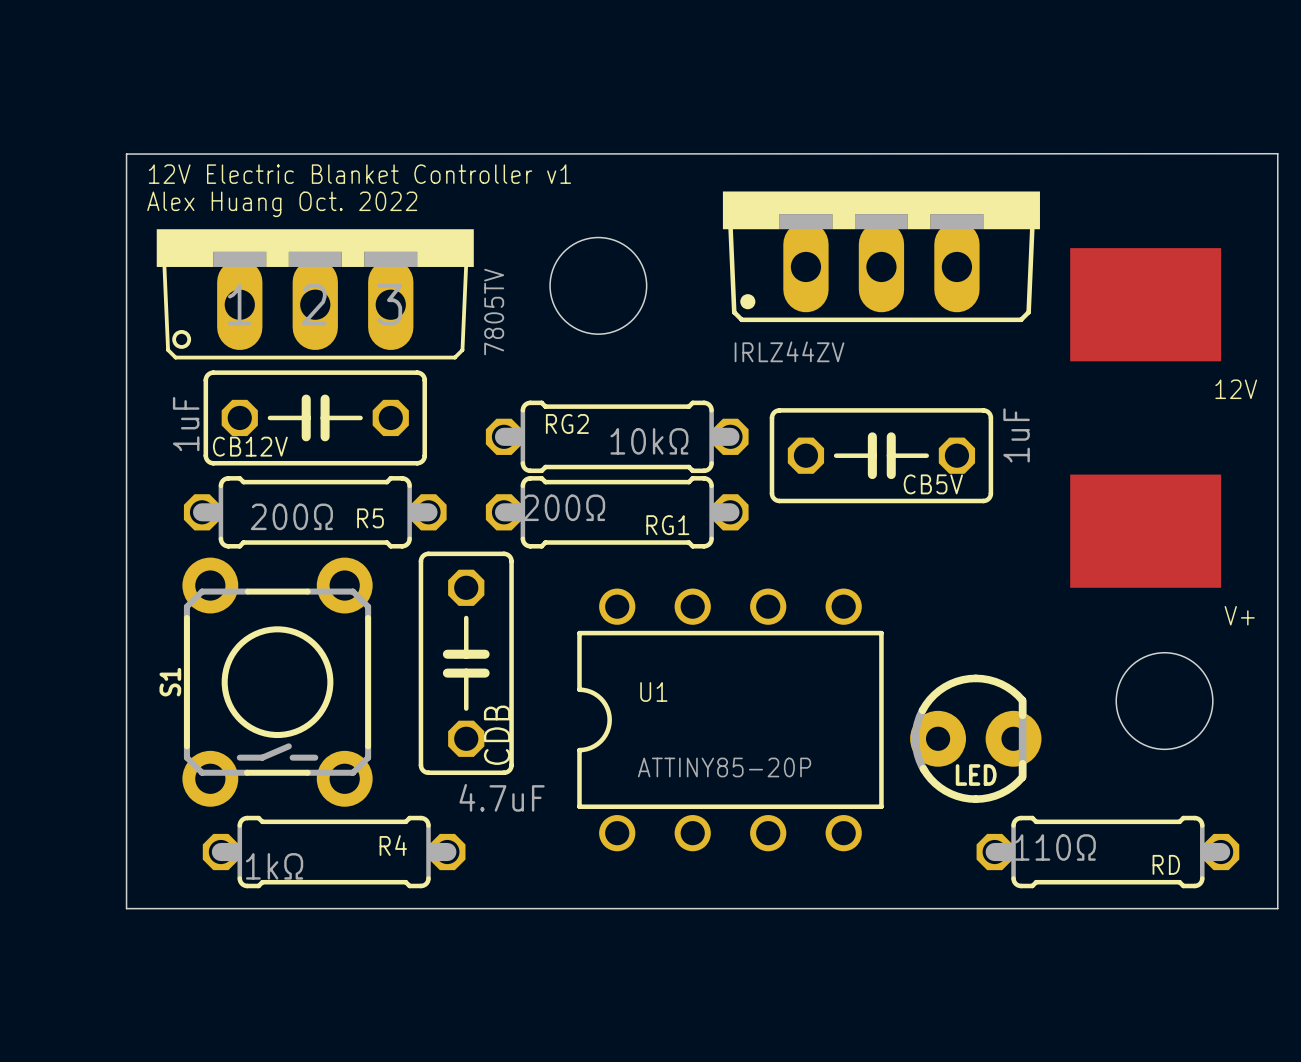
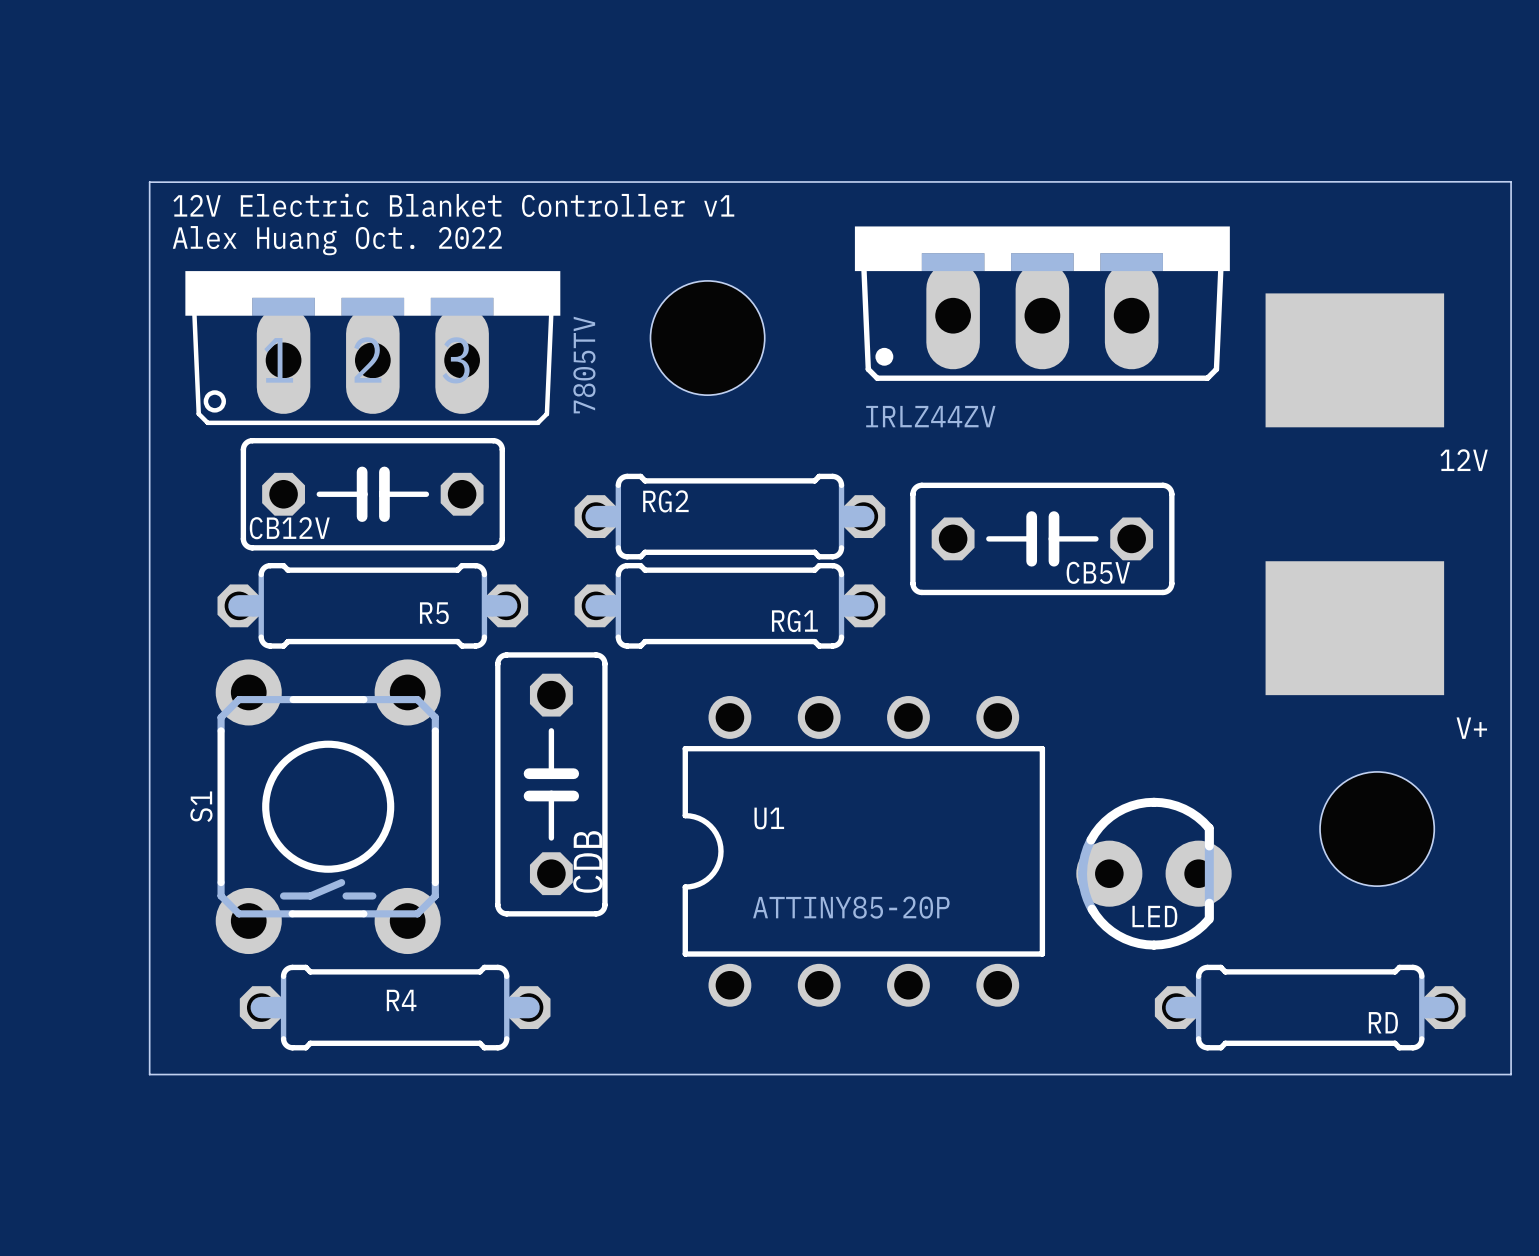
CB12V value: 1uF (186, 424) -> none
CB5V value: 1uF (1016, 435) -> none
RG2 value: 10kΩ (649, 441) -> none
RG1 value: 200Ω (564, 507) -> none
R5 value: 200Ω (291, 516) -> none
CDB value: 4.7uF (502, 797) -> none
R4 name position: R4 (393, 845) -> R4 (401, 1000)
RD value: 110Ω (1055, 847) -> none
R4 value: 1kΩ (274, 866) -> none

